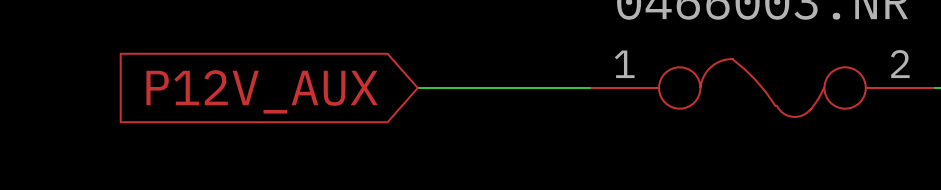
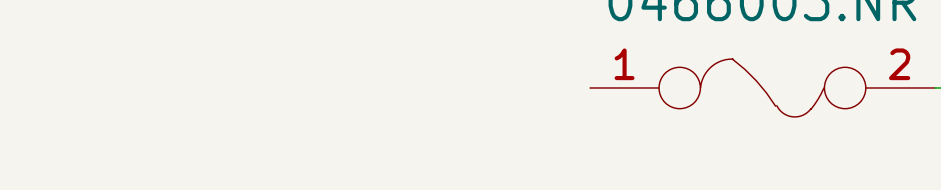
wire: (417, 87) (590, 87) -> none
global label: P12V_AUX (262, 91) -> none

